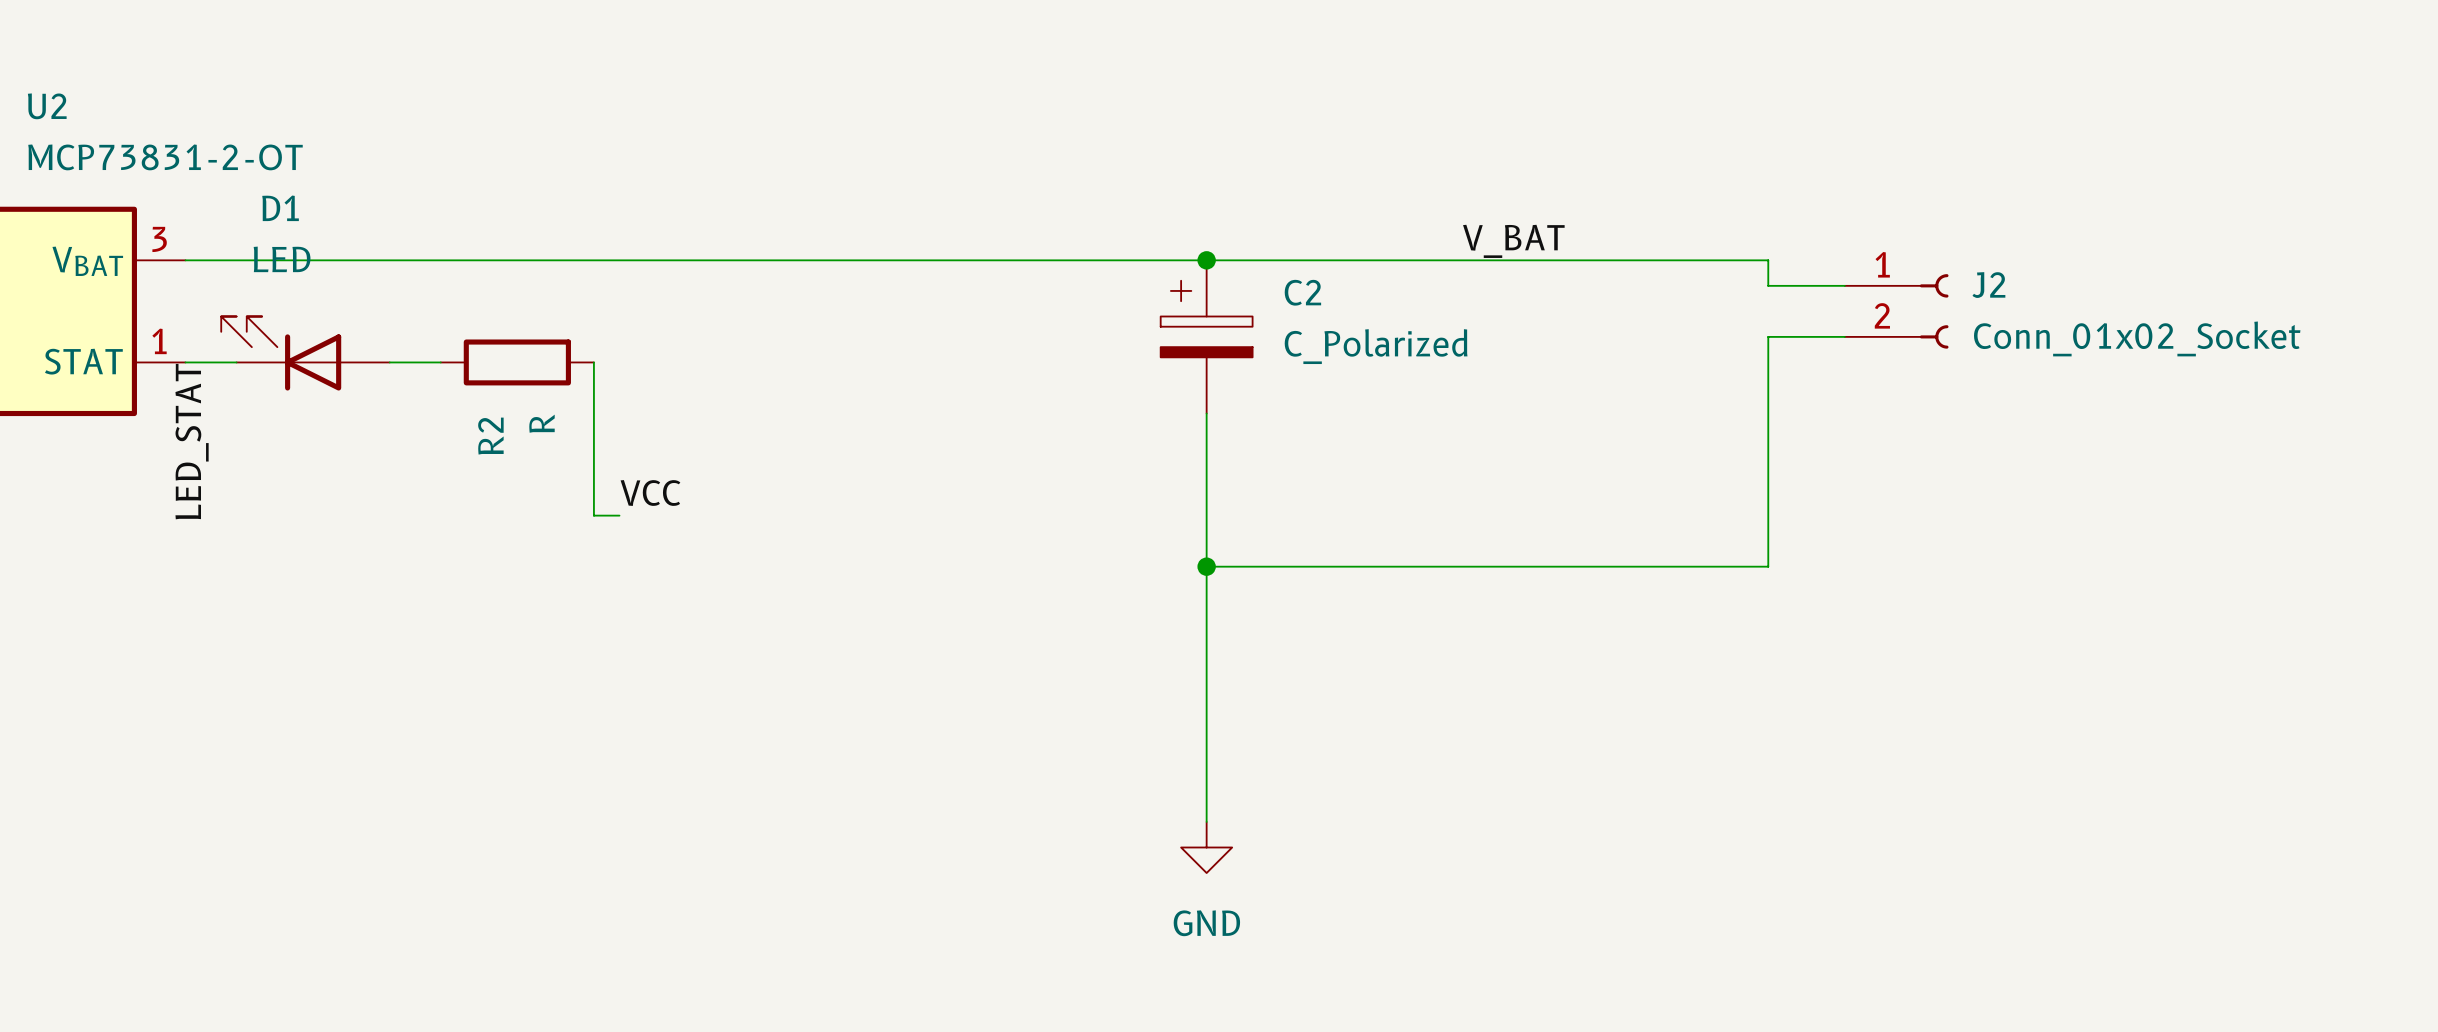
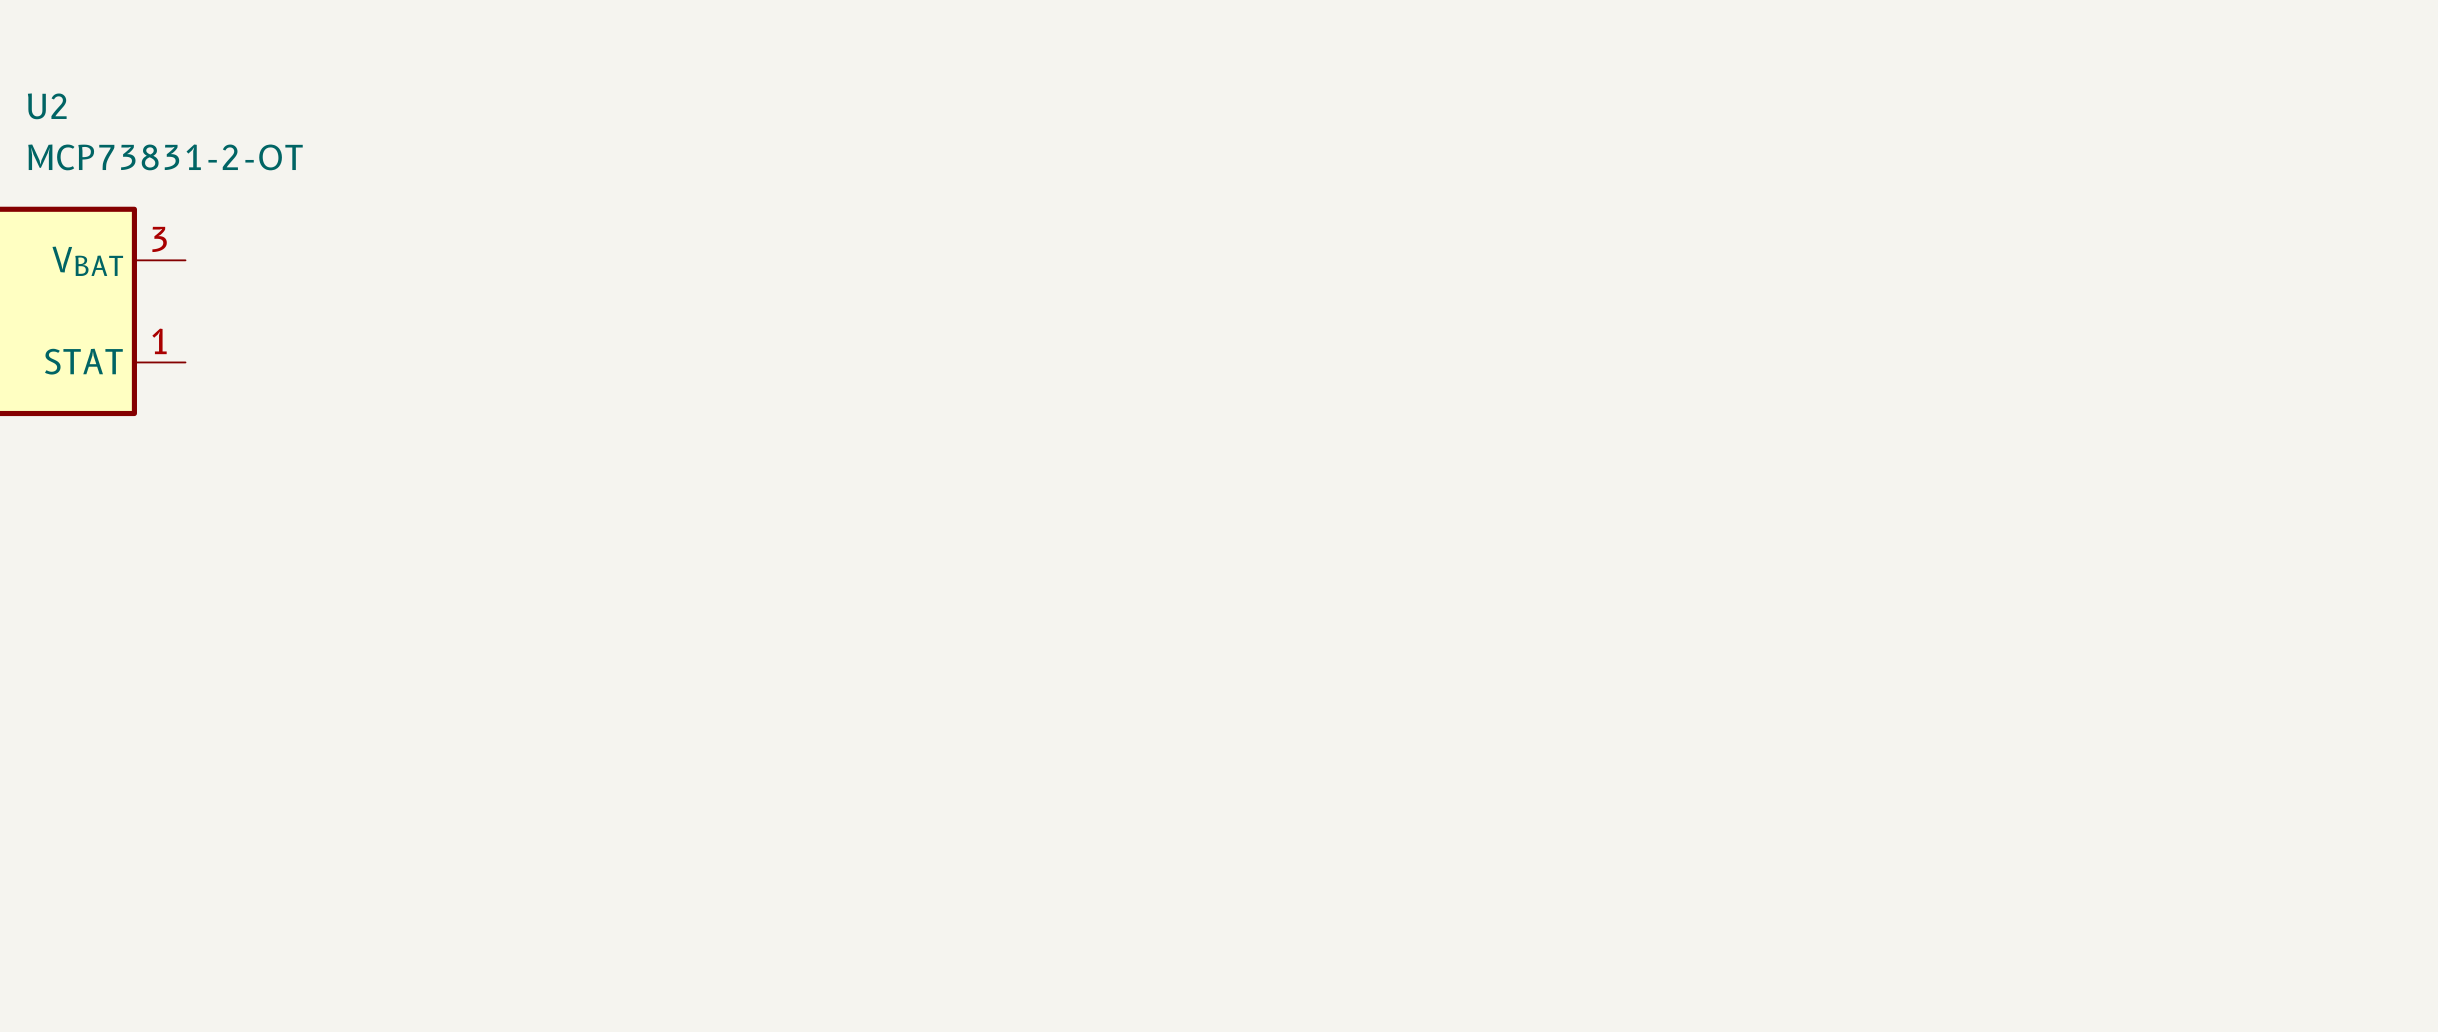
label: V_BAT (1513, 241) -> none
wire: (185, 260) (1768, 260) (1768, 285) (1844, 285) -> none
junction: (1206, 260) -> none
J2: Conn_01x02_Socket (1896, 311) -> none
C2: C_Polarized (1206, 336) -> none
wire: (1844, 336) (1768, 336) (1768, 566) (1206, 566) -> none
D1: LED (305, 353) -> none
wire: (185, 362) (236, 362) -> none
wire: (389, 362) (440, 362) -> none
R2: R (517, 362) -> none
wire: (593, 362) (593, 515) (619, 515) -> none
wire: (1206, 413) (1206, 821) -> none
label: LED_STAT (192, 441) -> none
label: VCC (650, 493) -> none
junction: (1206, 566) -> none
power symbol: GND (1206, 847) -> none

